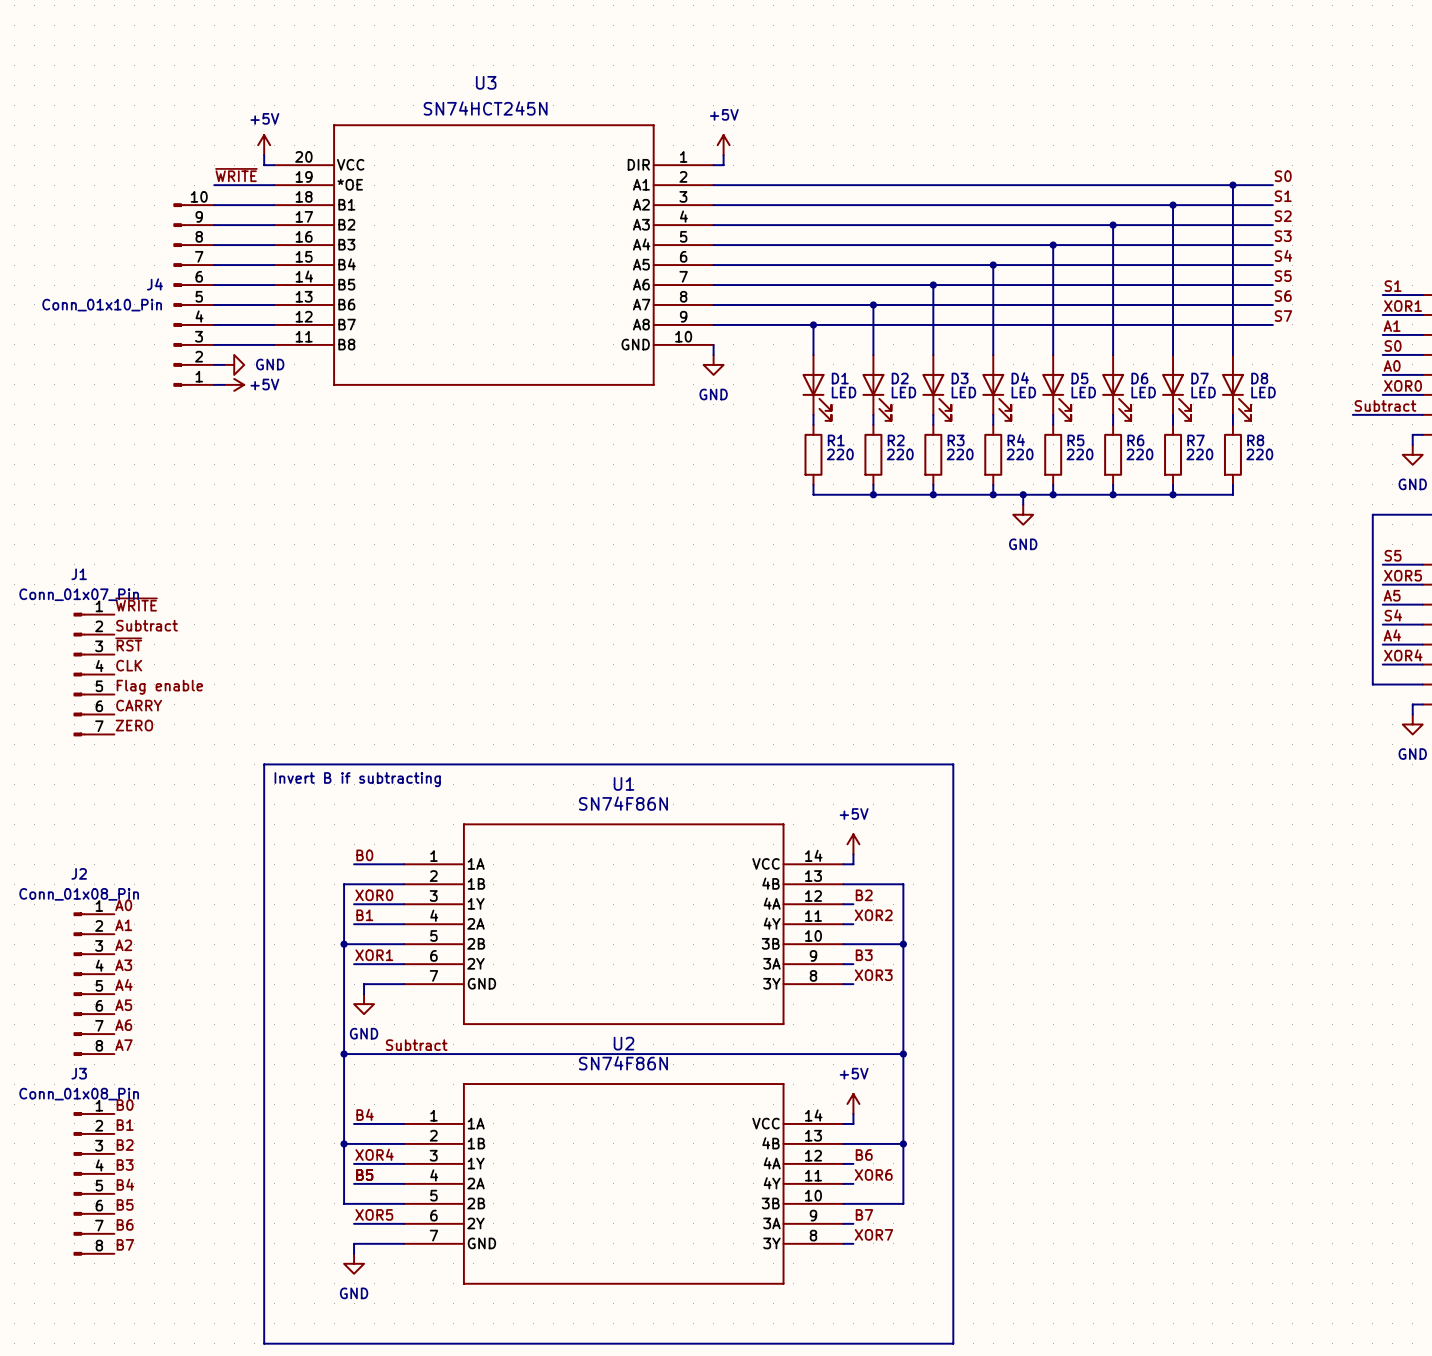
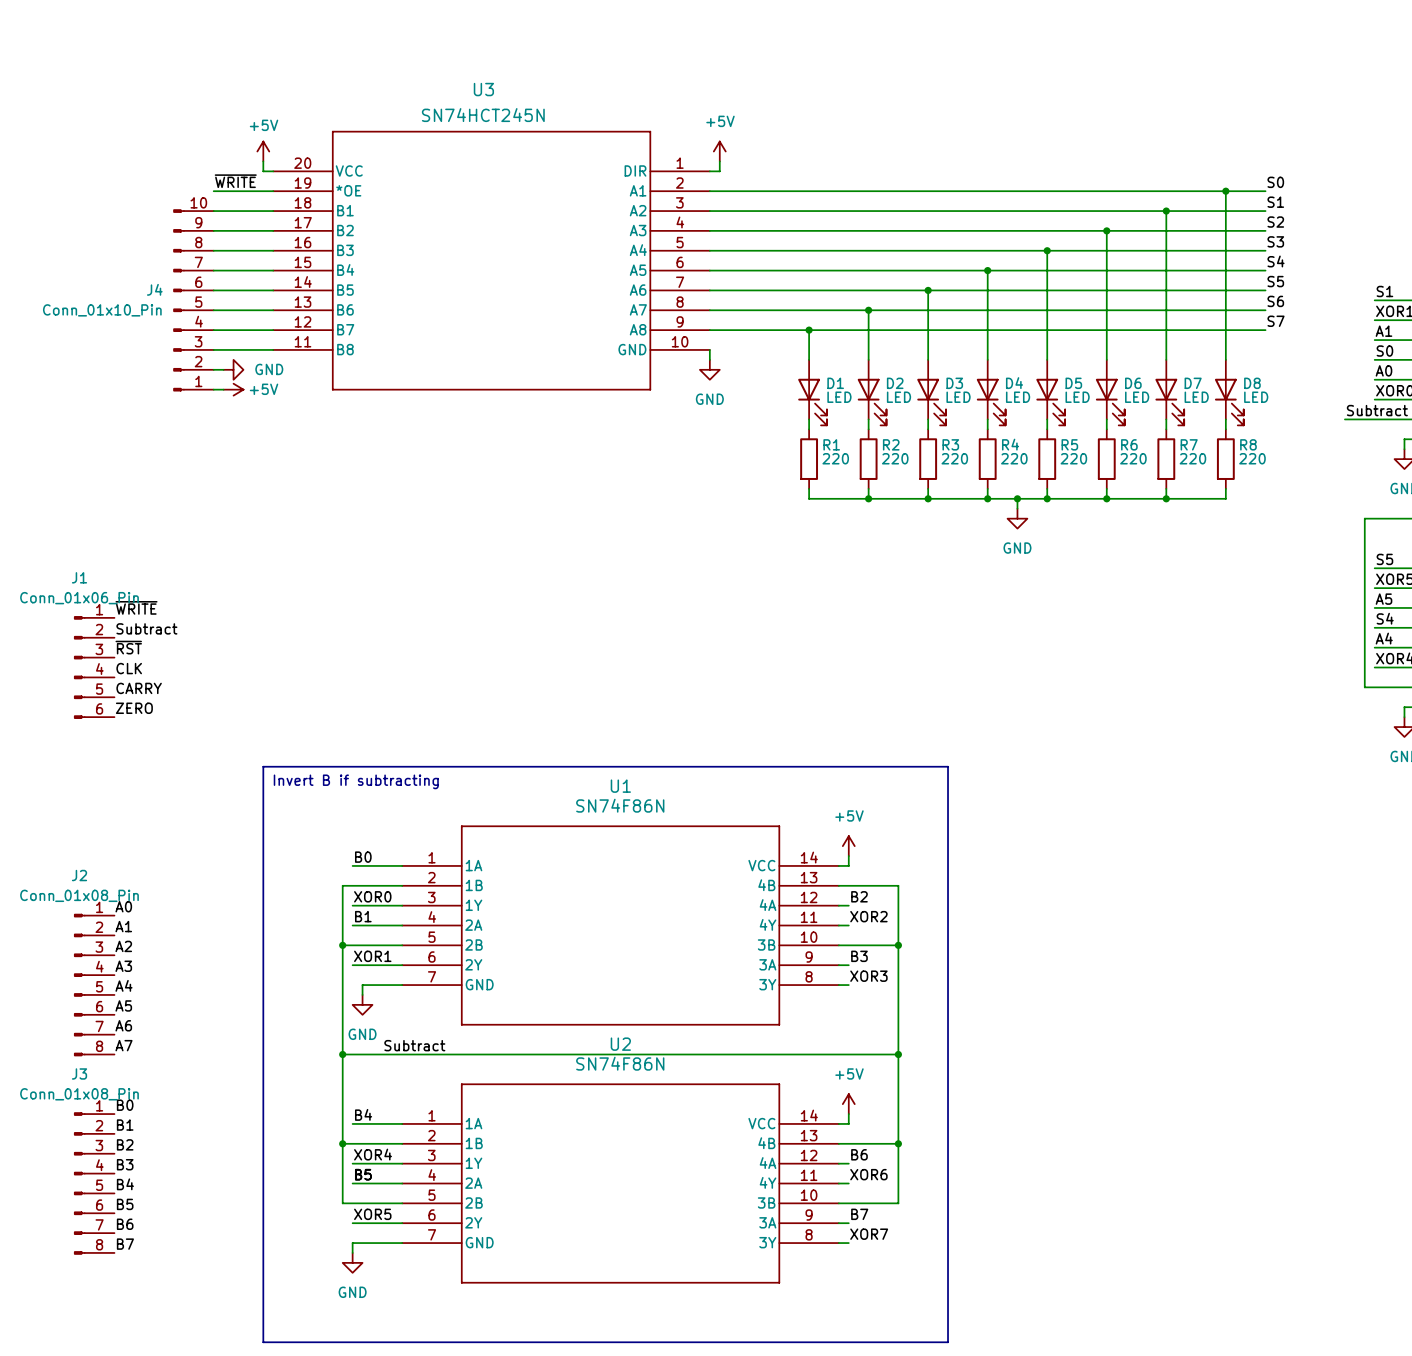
J1 value: Conn_01x07_Pin (79, 594) -> Conn_01x06_Pin (79, 598)
J1 symbol: [73, 613, 115, 737] -> [74, 616, 115, 719]
label: Flag enable (159, 687) -> CARRY (139, 688)
label: CARRY (139, 705) -> ZERO (134, 708)
label: ZERO (134, 725) -> none

